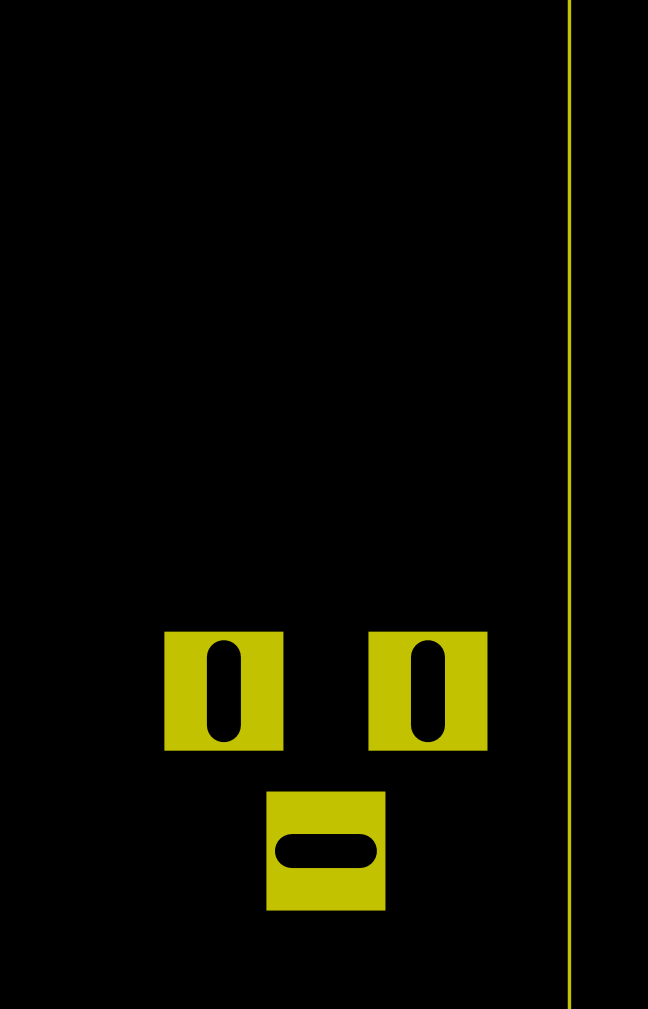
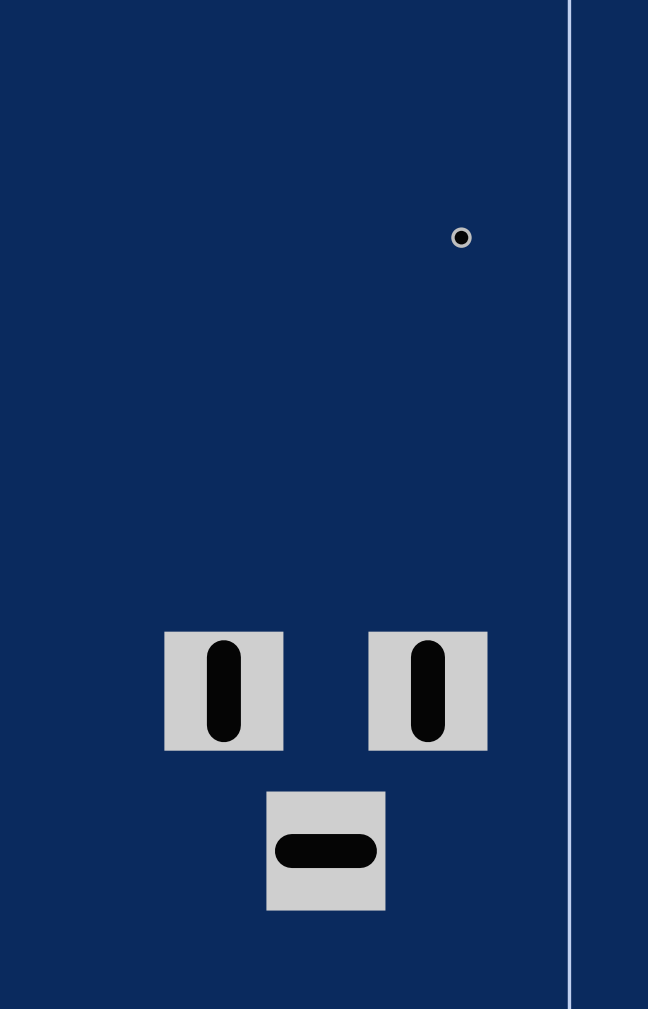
via: none -> (461, 237)

